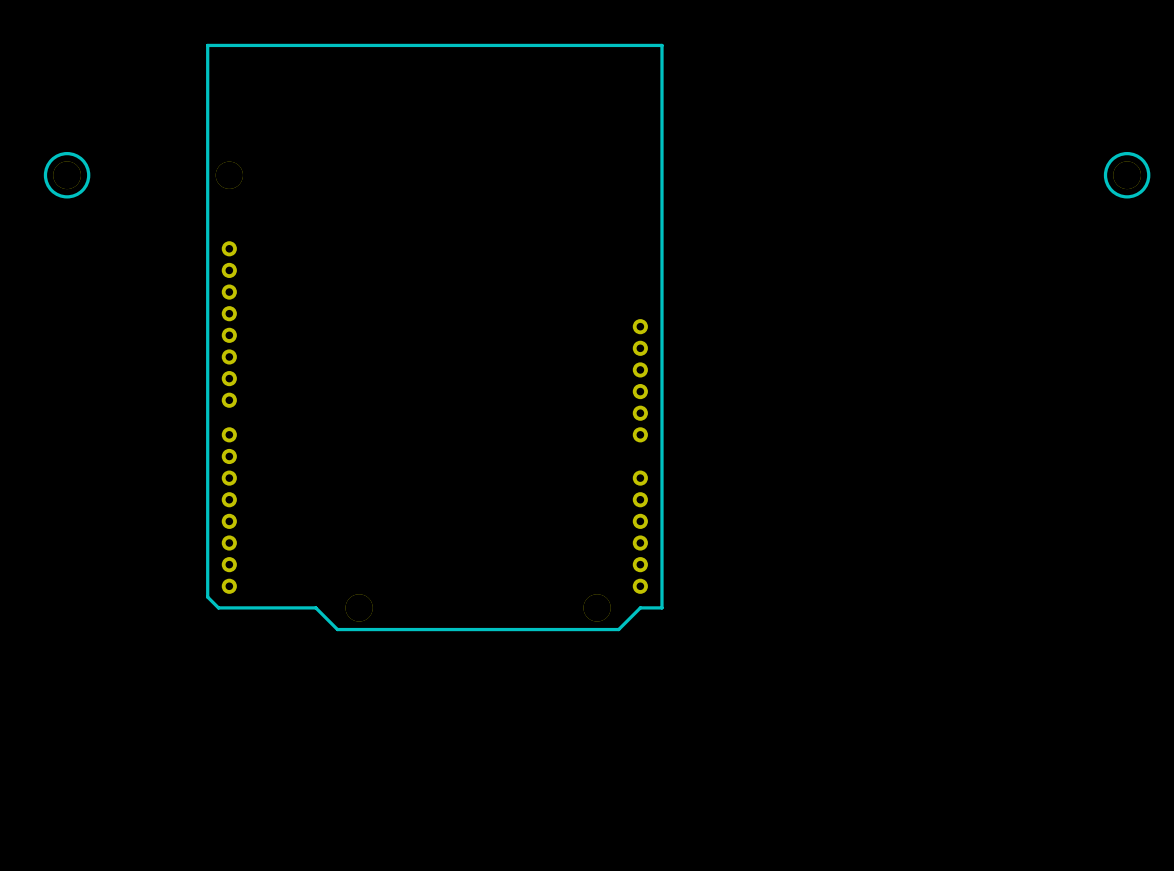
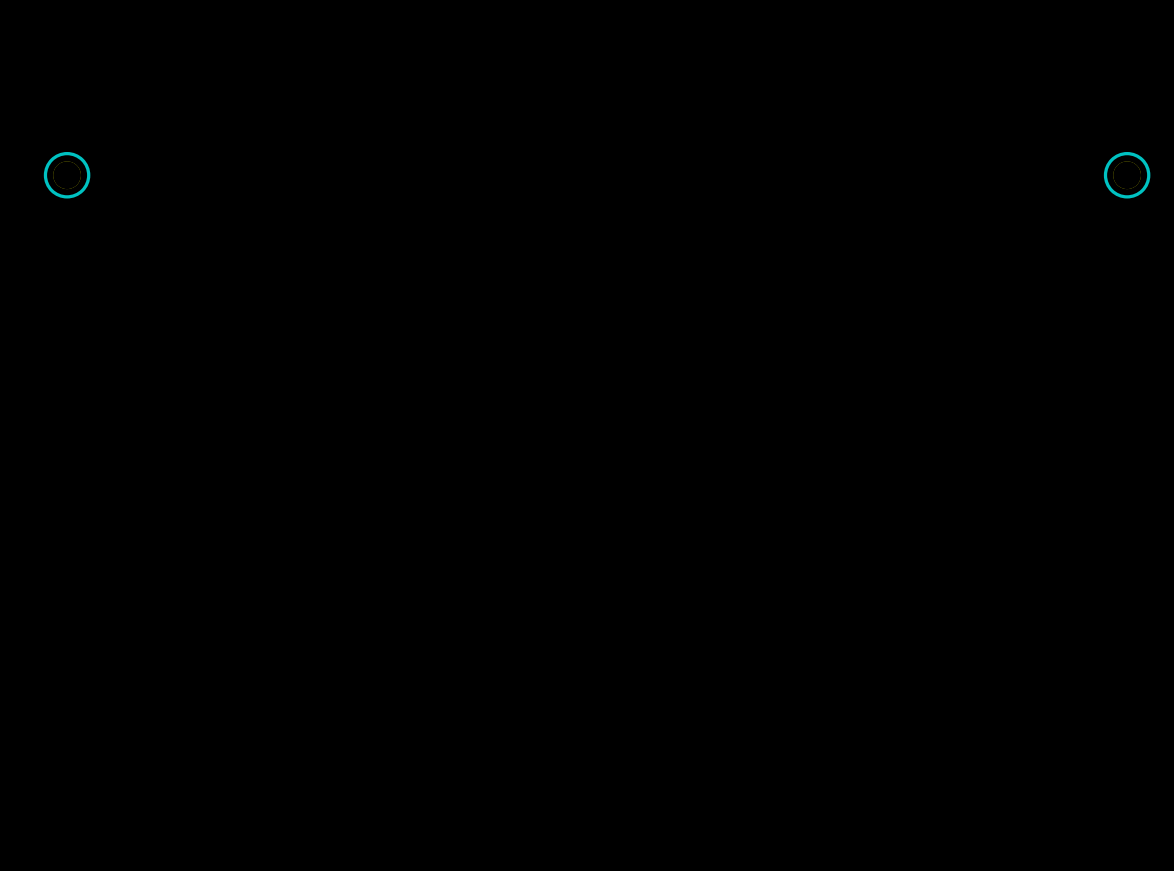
part: (434, 337) -> none

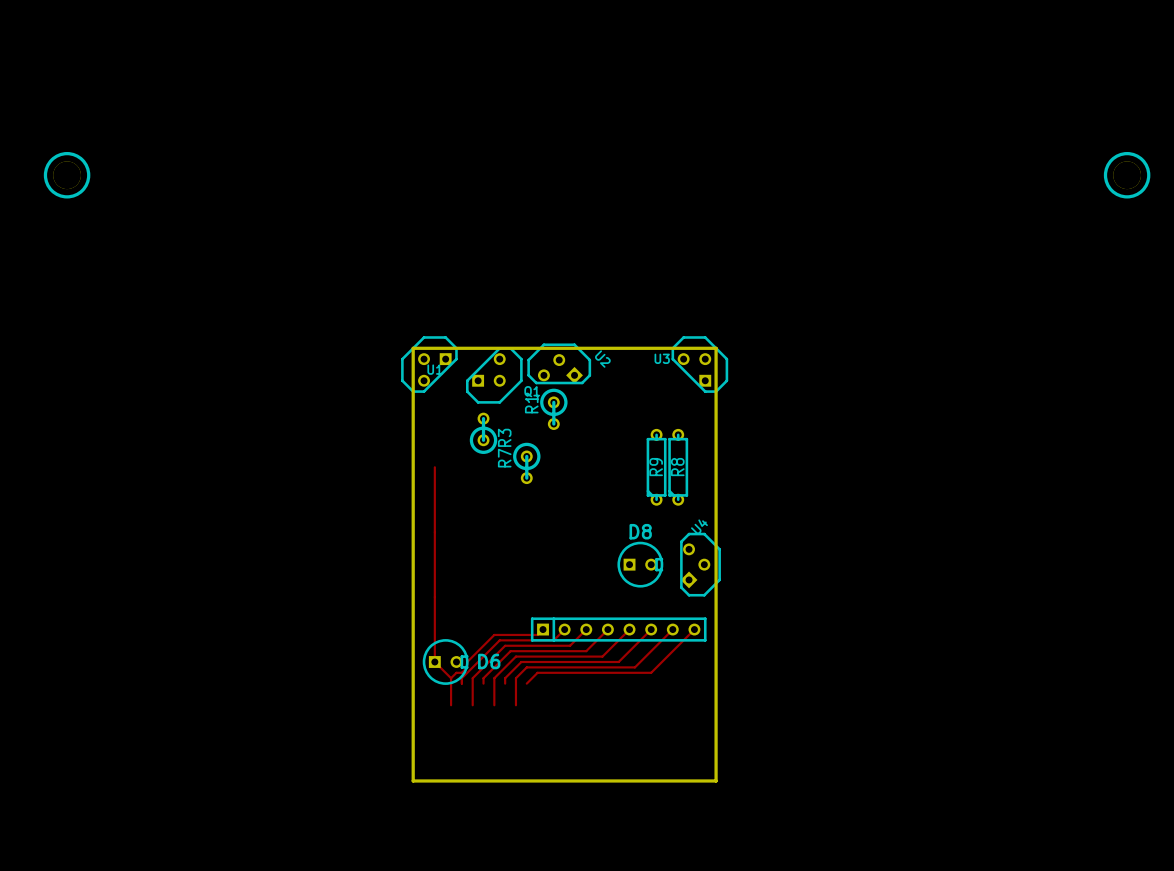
board edge: none -> (413, 348) (716, 348) (716, 780) (413, 780) (413, 348)
U2: none -> (559, 363)
U1: none -> (429, 364)
U3: none -> (699, 364)
Q1: none -> (494, 375)
R1: none -> (553, 409)
R3: none -> (483, 433)
R7: none -> (526, 463)
track: none -> (434, 467) (434, 661) (451, 678)
R9: none -> (656, 467)
R8: none -> (678, 467)
D8: none -> (640, 564)
U4: none -> (700, 564)
track: none -> (543, 629) (537, 634) (494, 634) (467, 661) (467, 667) (461, 672) (456, 672) (451, 678)
track: none -> (564, 629) (553, 640) (499, 640) (461, 678) (461, 683)
track: none -> (586, 629) (570, 645) (505, 645) (472, 678) (472, 705)
track: none -> (607, 629) (586, 651) (510, 651) (483, 678) (483, 683)
part: none -> (618, 629)
track: none -> (629, 629) (602, 656) (515, 656) (494, 678) (494, 705)
track: none -> (651, 629) (618, 661) (521, 661) (505, 678) (505, 683)
track: none -> (672, 629) (634, 667) (526, 667) (515, 678) (515, 705)
track: none -> (694, 629) (651, 672) (537, 672) (526, 683)
D6: none -> (445, 661)
track: none -> (451, 678) (451, 705)

